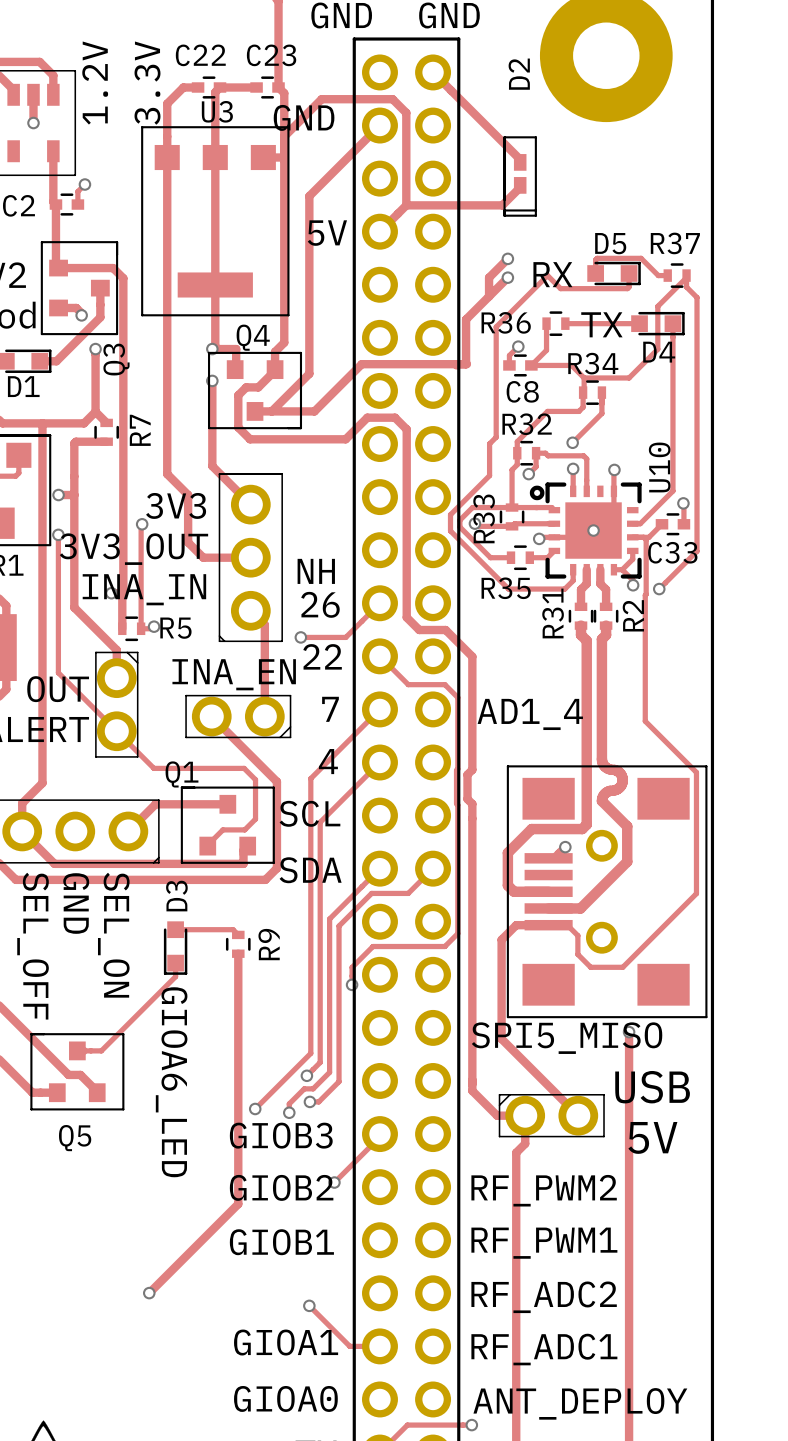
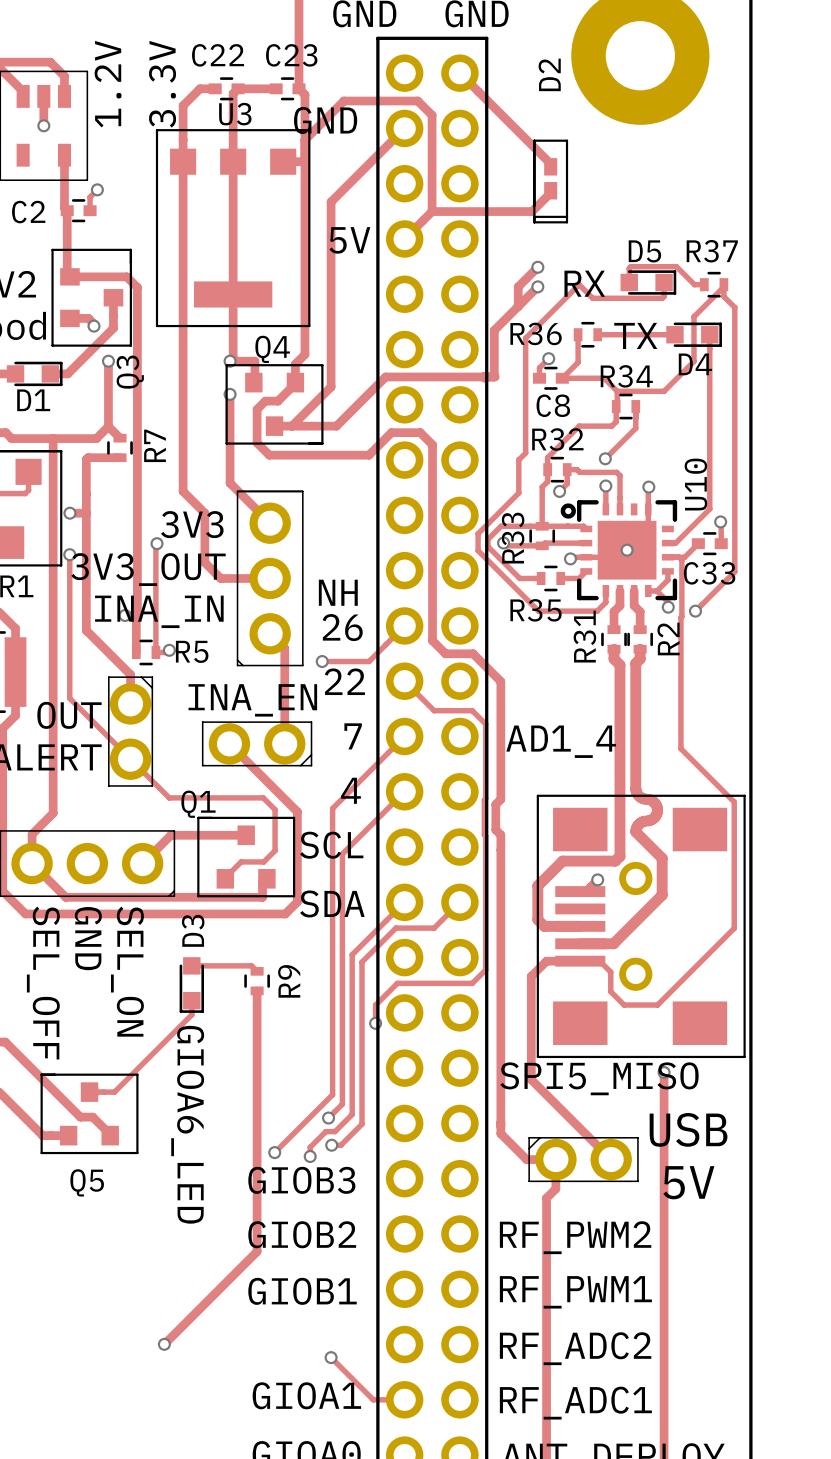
track: (379, 1134) (379, 1136) (334, 1182) -> none
via: (334, 1182) -> none

